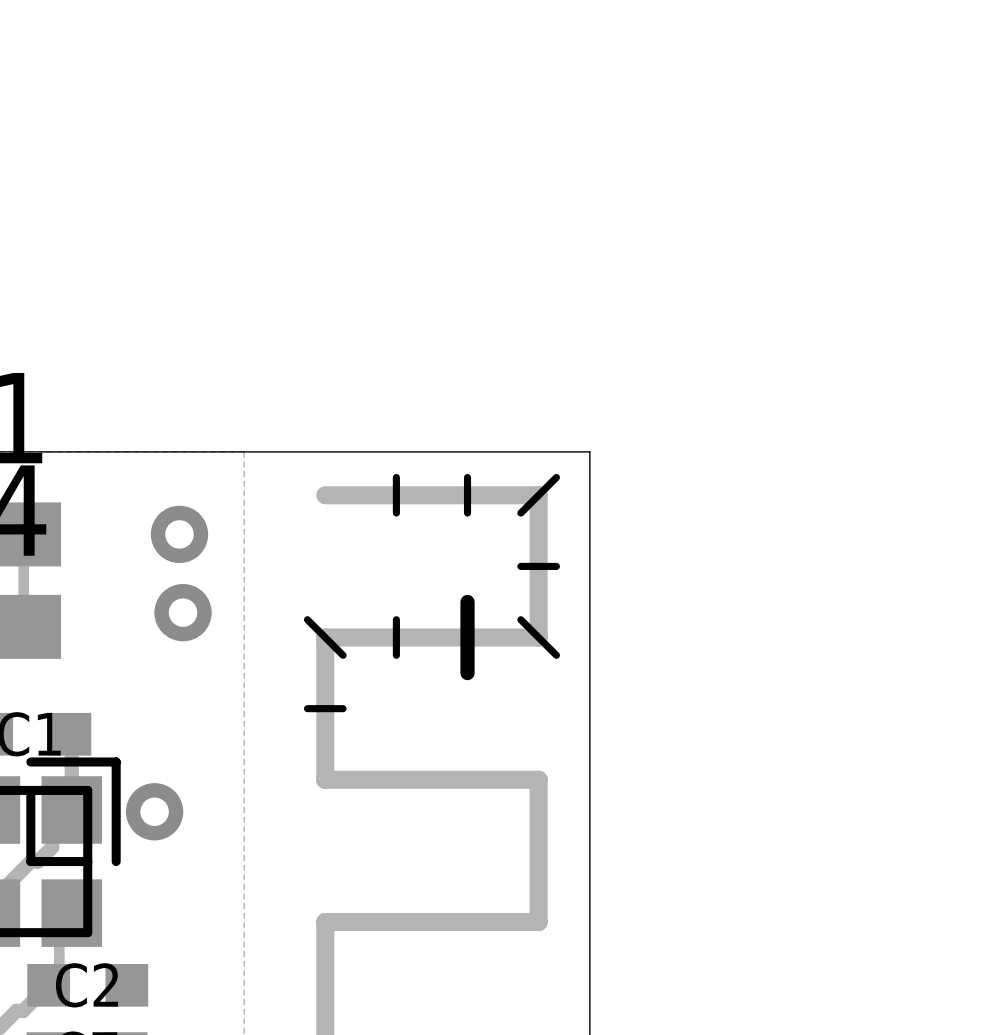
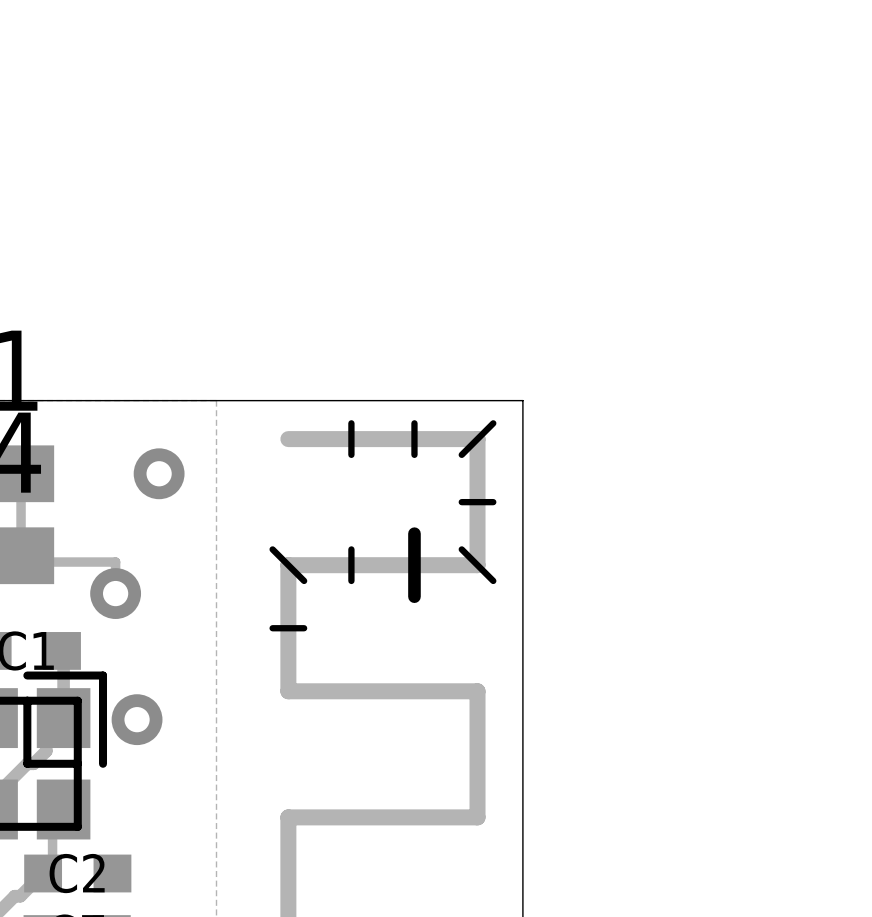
via position: (183, 612) -> (115, 593)
track: none -> (21, 555) (21, 562) (115, 562) (115, 593)

